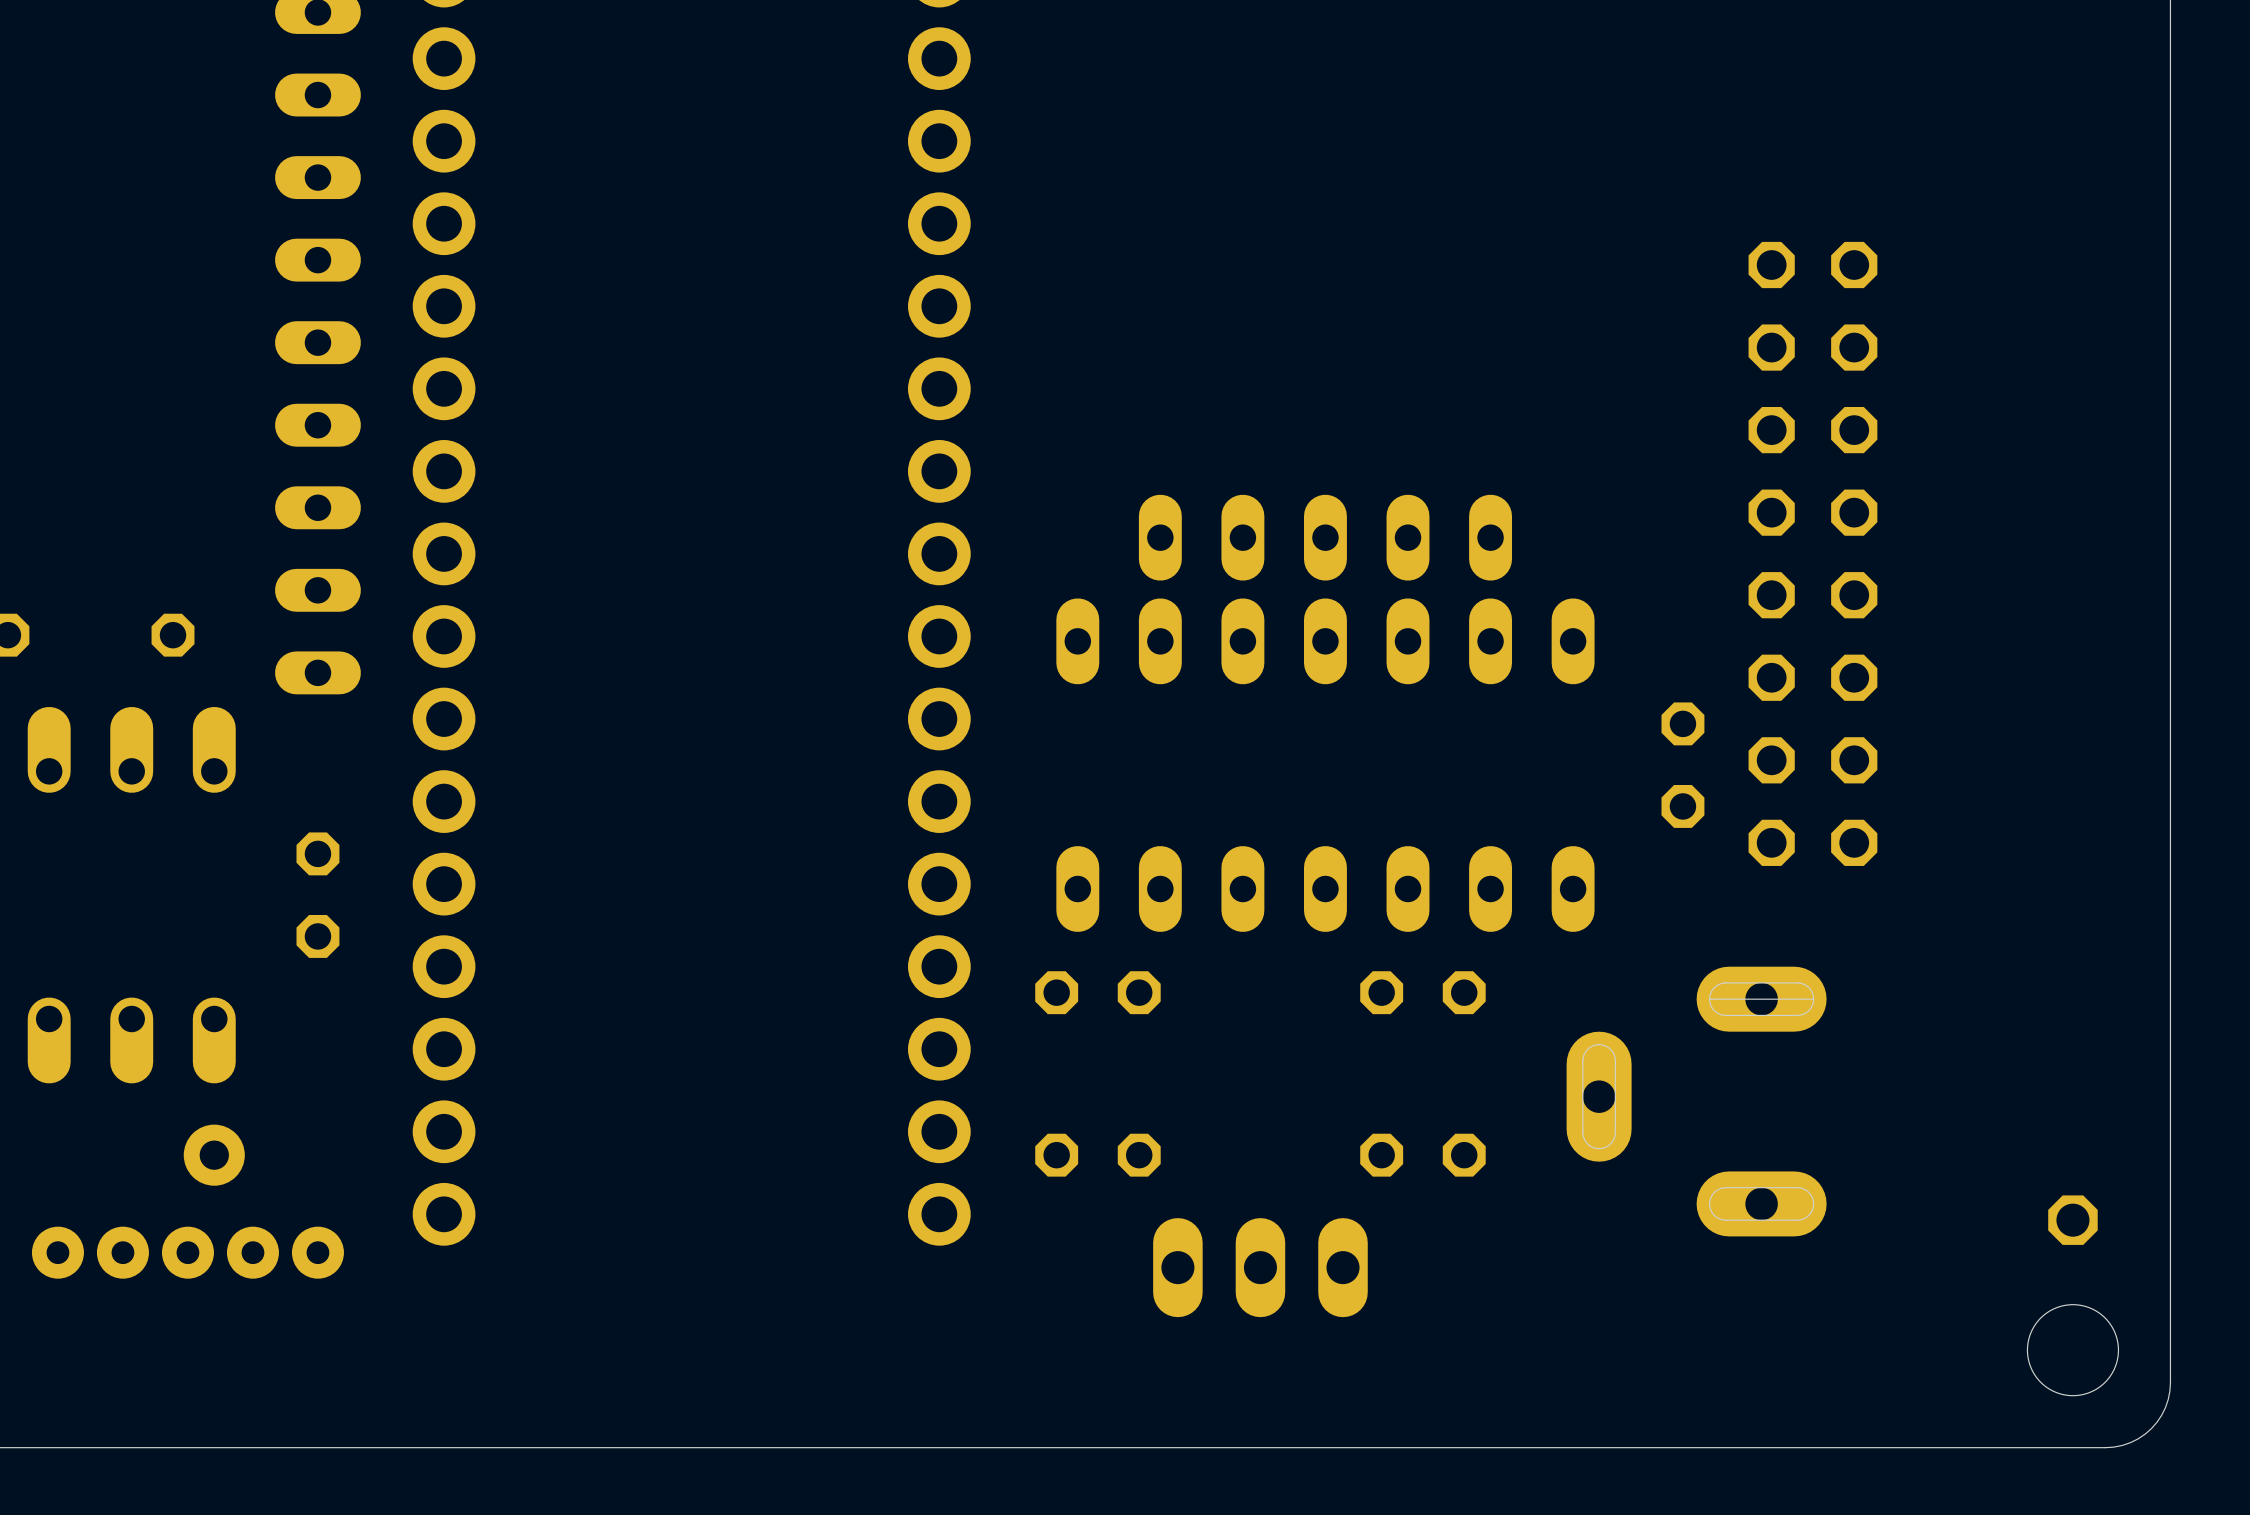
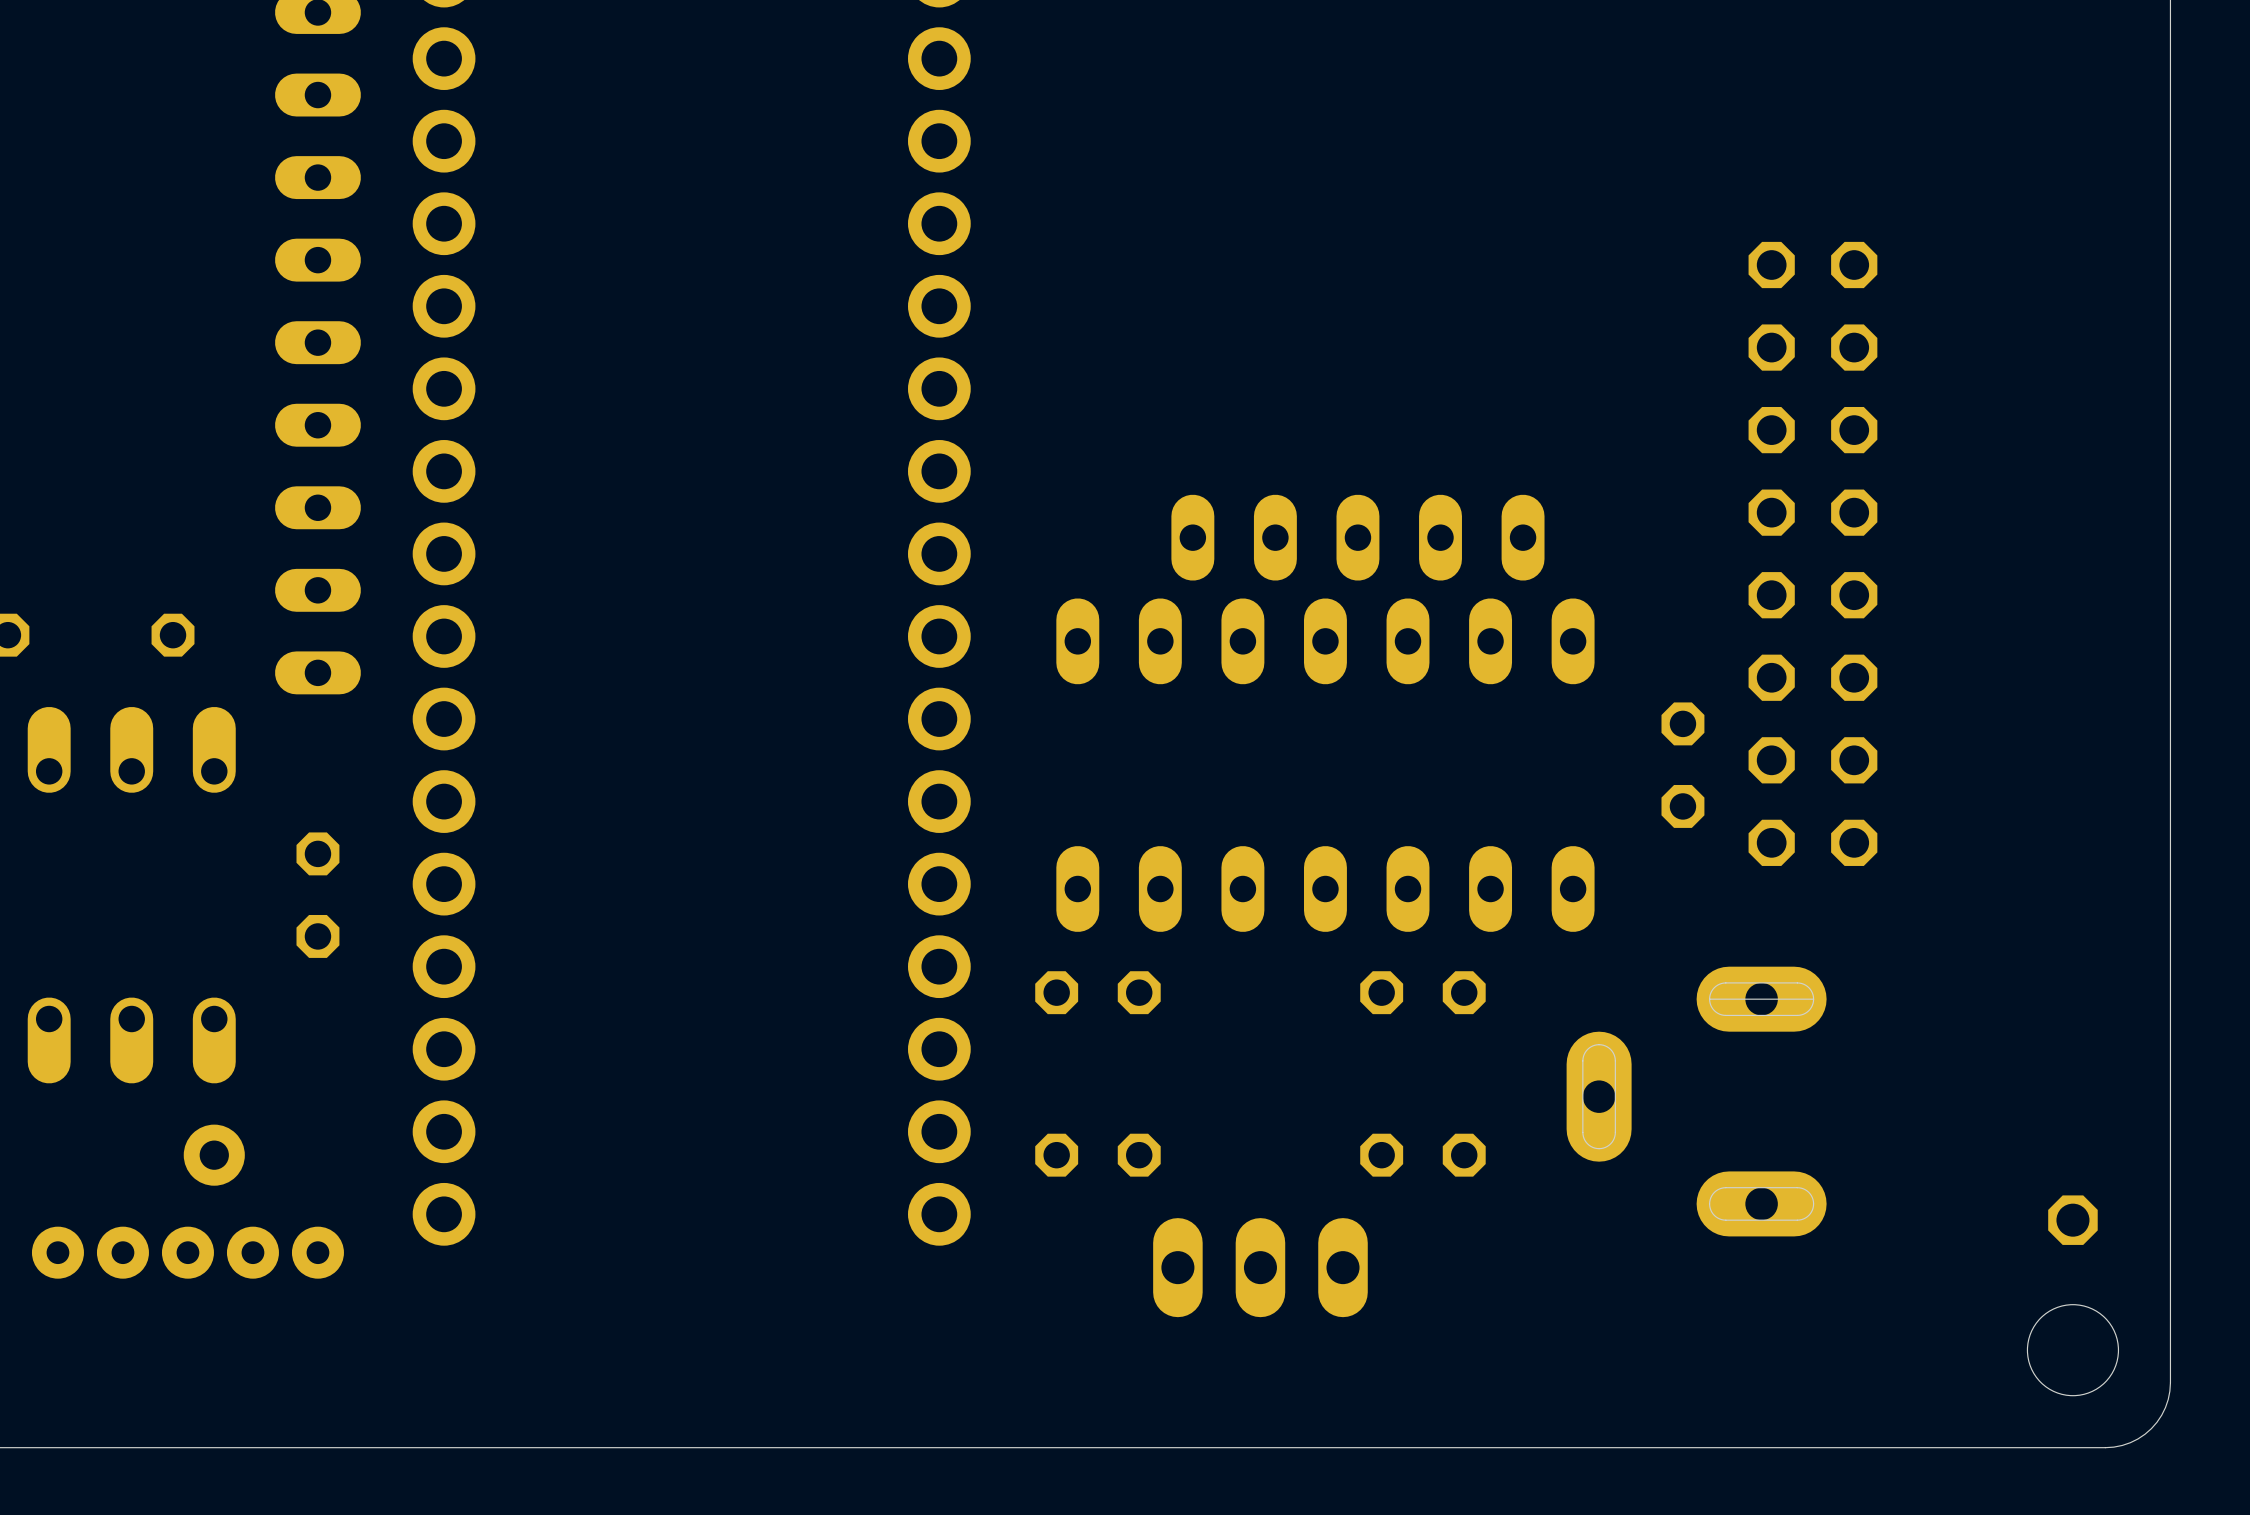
part position: (1325, 537) -> (1357, 537)

